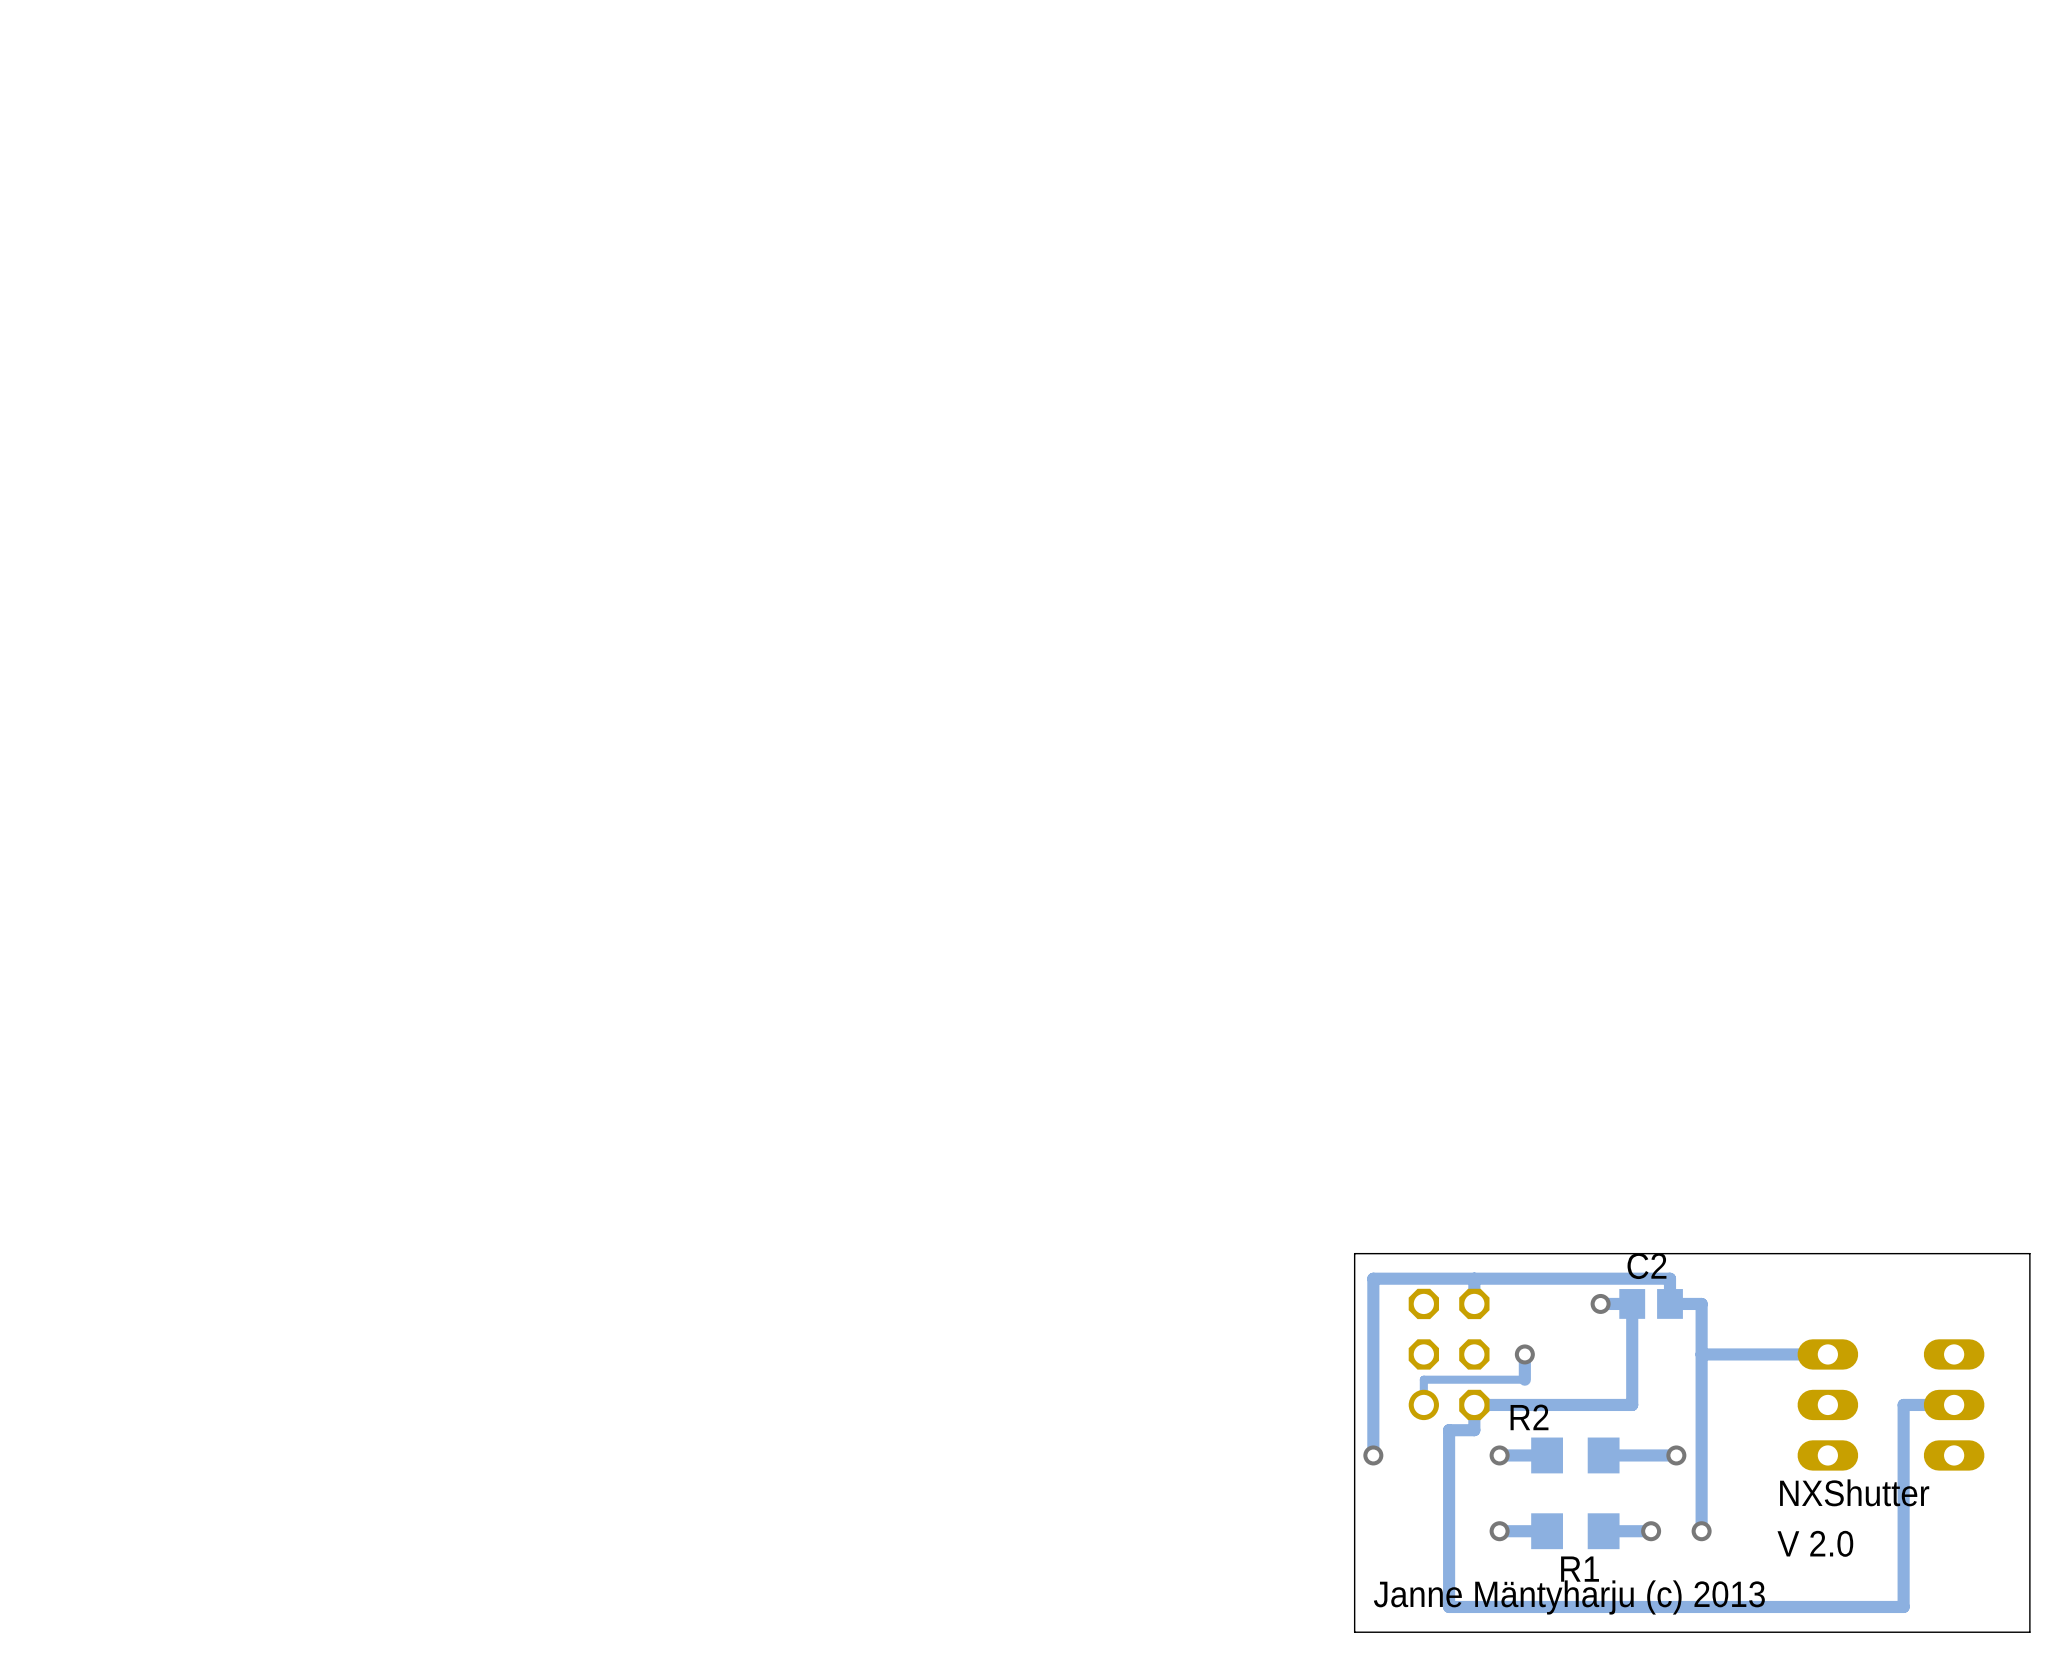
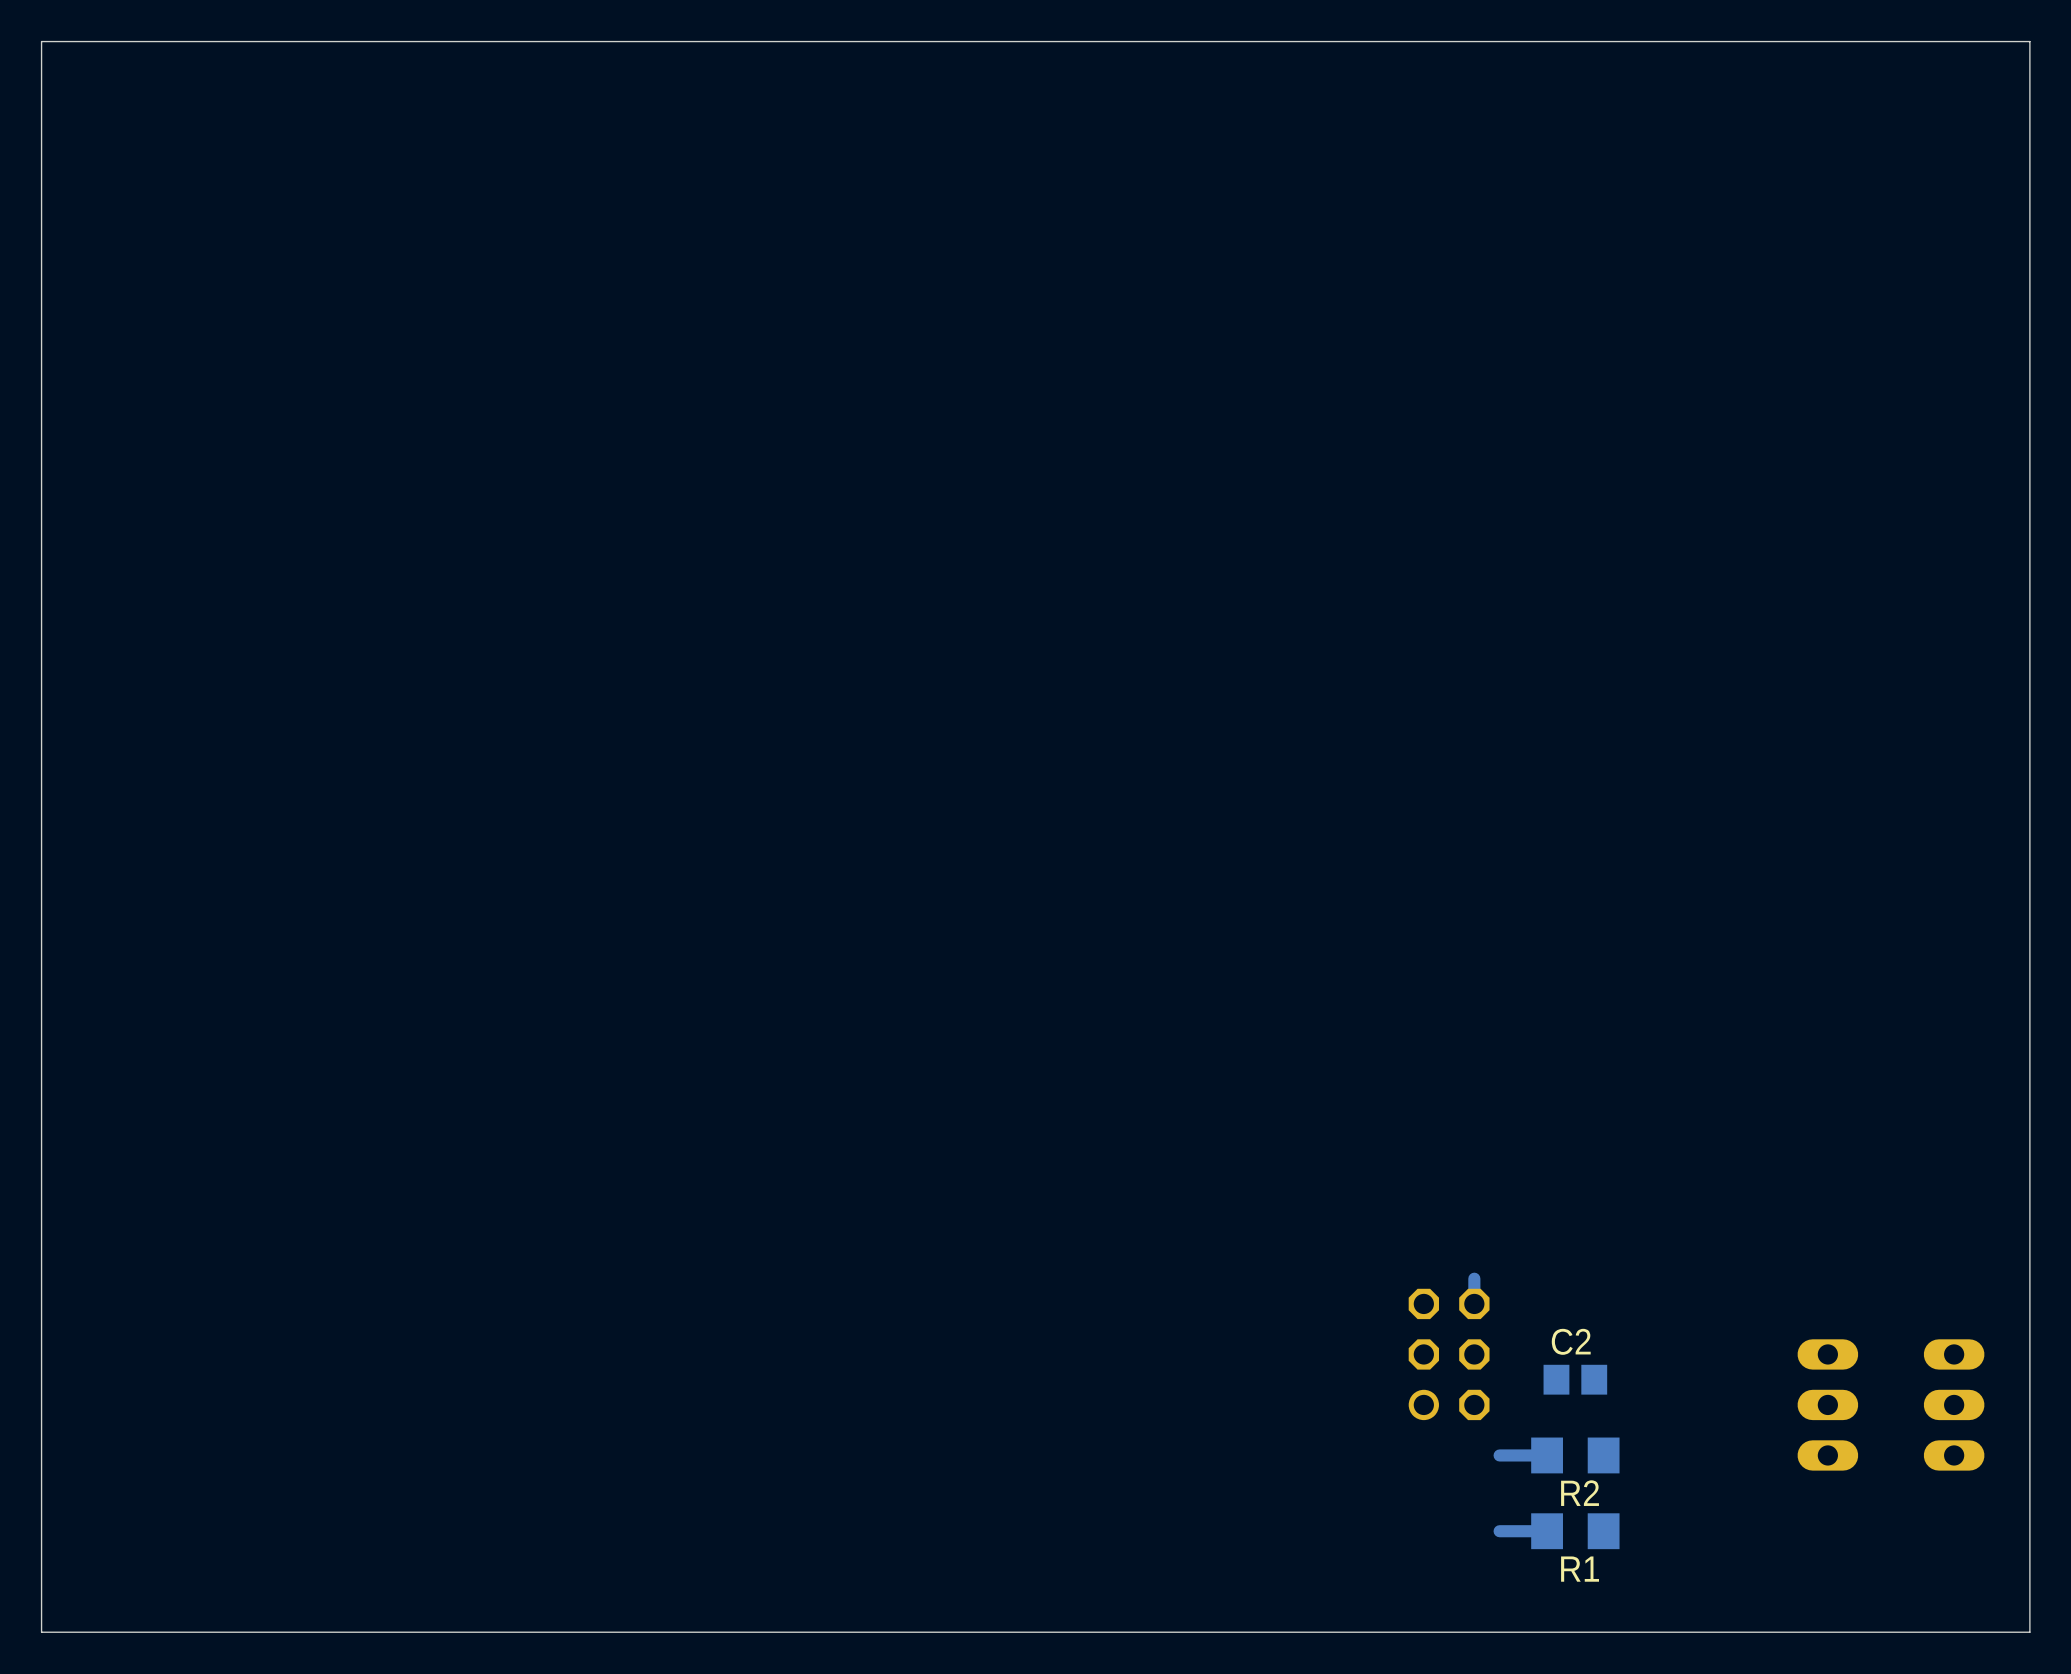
board edge: (2029, 1253) (1354, 1253) (1354, 1632) -> (2029, 1253) (2029, 41) (41, 41) (41, 1632) (1354, 1632)
track: (1600, 1303) (1632, 1303) (1632, 1404) (1474, 1404) (1474, 1430) (1449, 1430) (1449, 1606) (1903, 1606) (1903, 1404) (1954, 1404) -> none
via: (1600, 1303) -> none
C2 position: (1651, 1303) -> (1575, 1379)
track: (1524, 1354) (1524, 1379) (1423, 1379) (1423, 1404) -> none
via: (1524, 1354) -> none
track: (1827, 1354) (1701, 1354) -> none
R2 name position: R2 (1529, 1417) -> R2 (1580, 1493)
track: (1373, 1455) (1373, 1278) (1670, 1278) (1670, 1303) (1701, 1303) (1701, 1531) -> none
via: (1373, 1455) -> none
via: (1499, 1455) -> none
track: (1676, 1455) (1603, 1455) -> none
via: (1676, 1455) -> none
text: NXShutter (1854, 1492) -> none
via: (1499, 1531) -> none
track: (1651, 1531) (1603, 1531) -> none
via: (1651, 1531) -> none
via: (1701, 1531) -> none
text: V 2.0 (1815, 1543) -> none
text: Janne Mäntyharju (c) 2013 (1569, 1597) -> none

